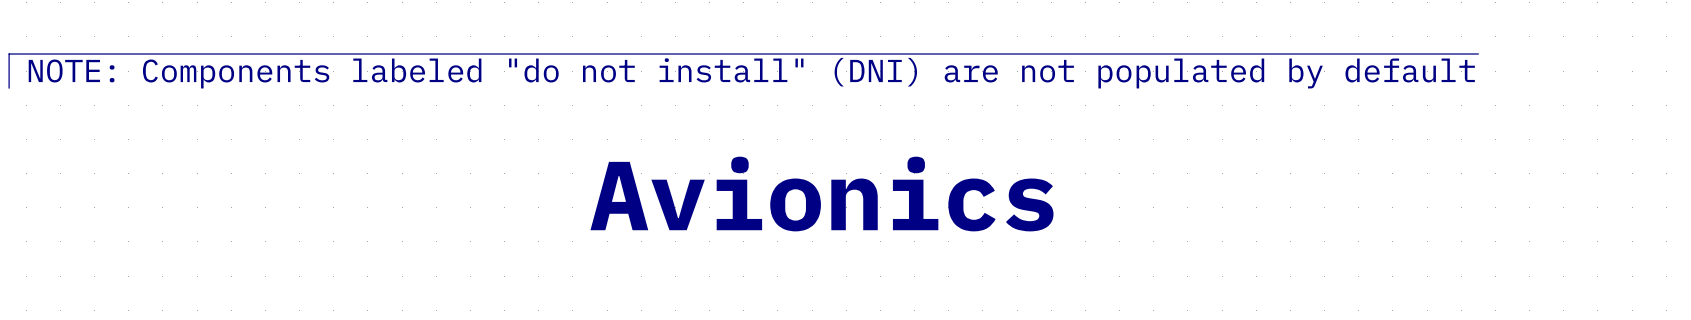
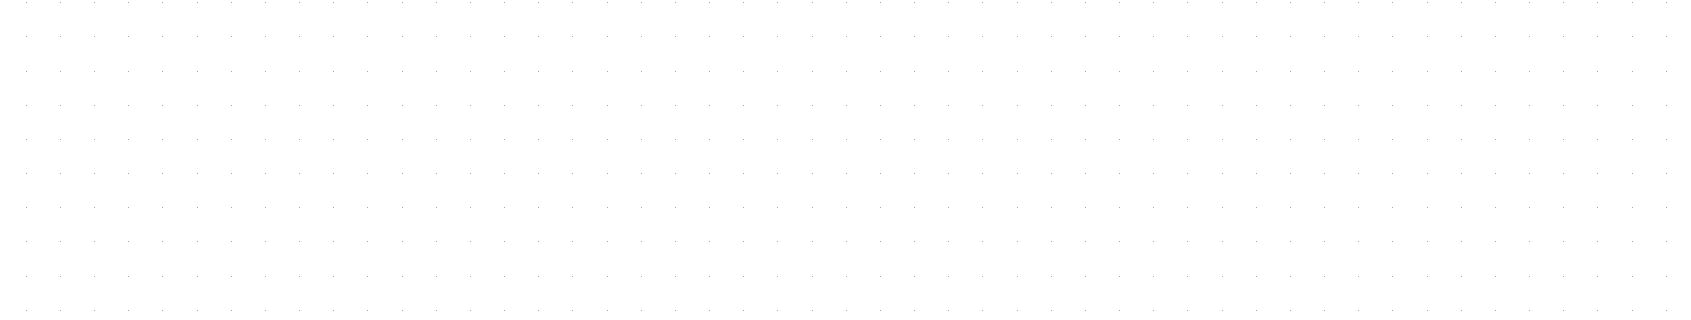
line: (1478, 54) (9, 54) (9, 88) -> none
text: NOTE: Components labeled "do not install" (DNI) are not populated by default (751, 73) -> none
text: Avionics (821, 194) -> none

